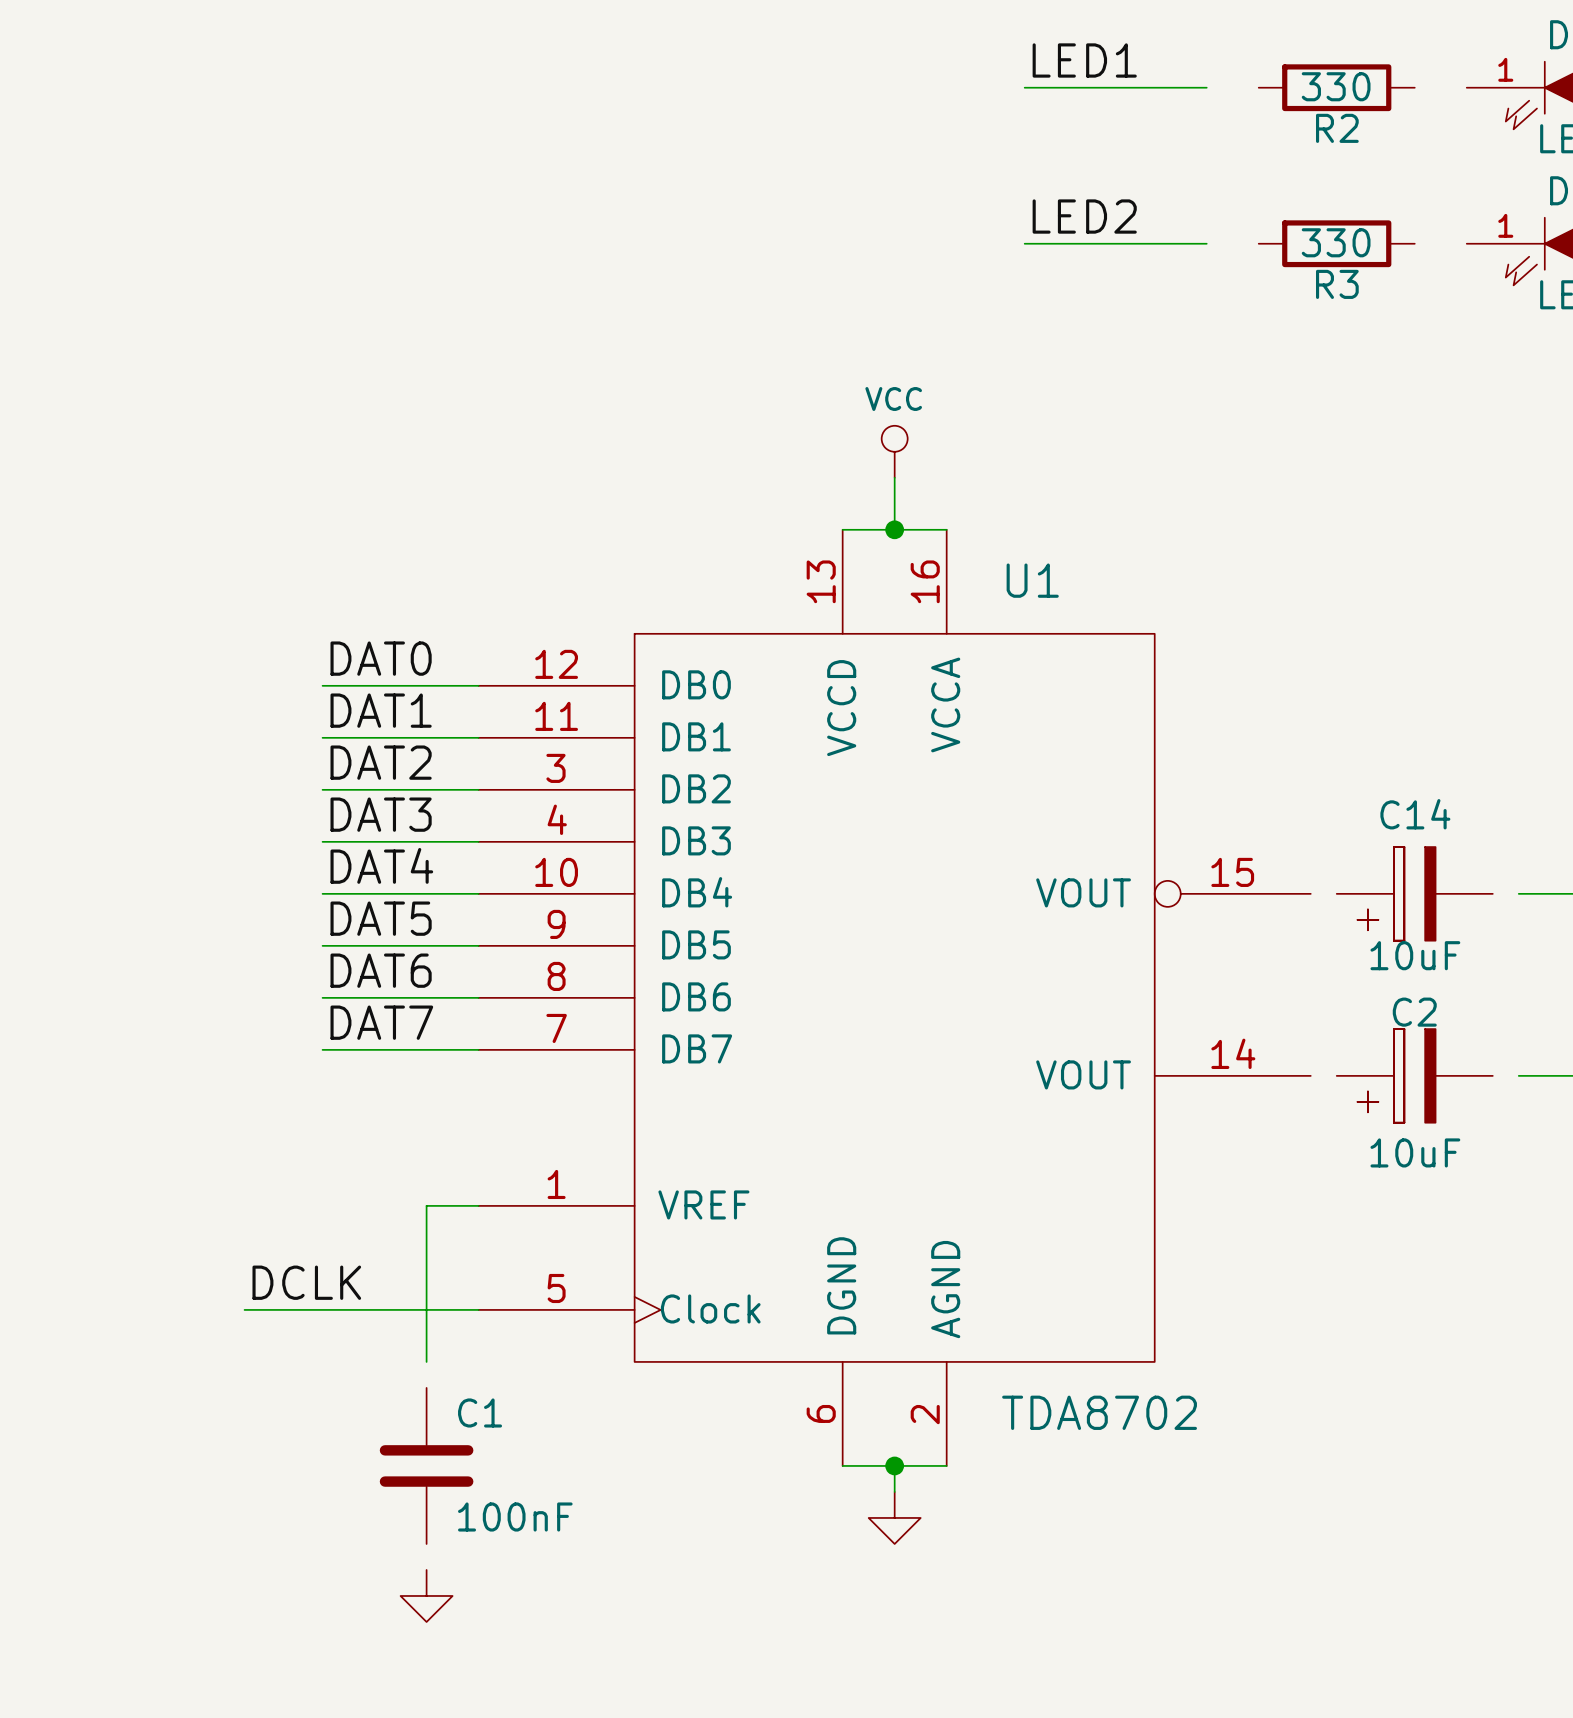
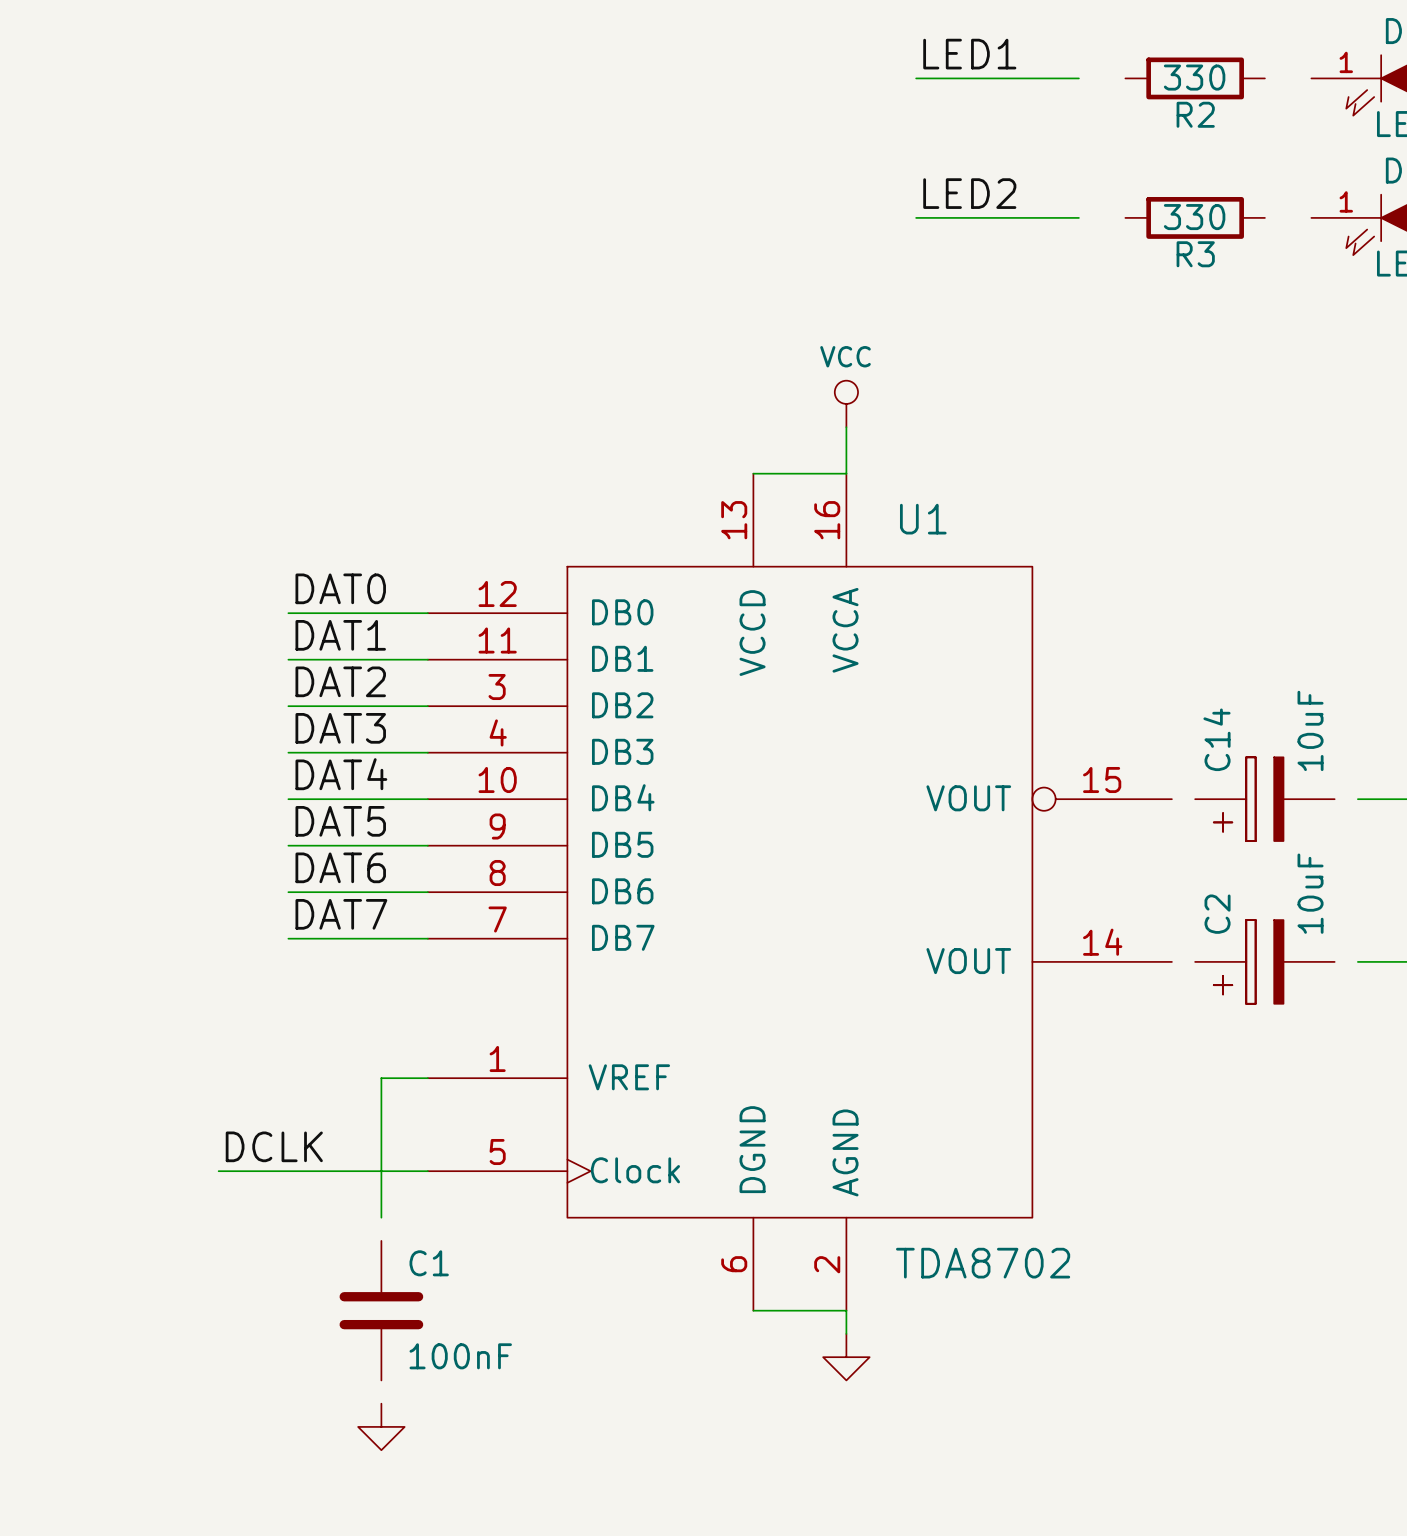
power symbol position: VCC (894, 451) -> VCC (846, 403)
wire: (894, 477) (894, 529) -> (846, 427) (846, 473)
junction: (894, 529) -> none
C14 name rotation: 0° (1415, 814) -> 90° counterclockwise (1216, 739)
C14 value rotation: 0° (1415, 955) -> 90° counterclockwise (1310, 730)
C14 value position: 10uF (1415, 955) -> 10uF (1310, 730)
C2 name rotation: 0° (1414, 1012) -> 90° counterclockwise (1217, 914)
C2 value rotation: 0° (1415, 1152) -> 90° counterclockwise (1310, 893)
C2 value position: 10uF (1415, 1152) -> 10uF (1310, 893)
wire: (894, 1465) (894, 1491) -> (846, 1310) (846, 1333)
junction: (894, 1465) -> none
power symbol position: (894, 1517) -> (846, 1357)

